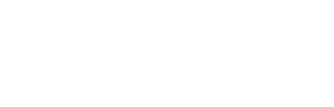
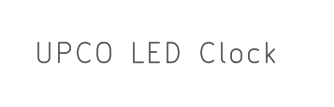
text: none -> UPCO LED Clock (156, 52)

